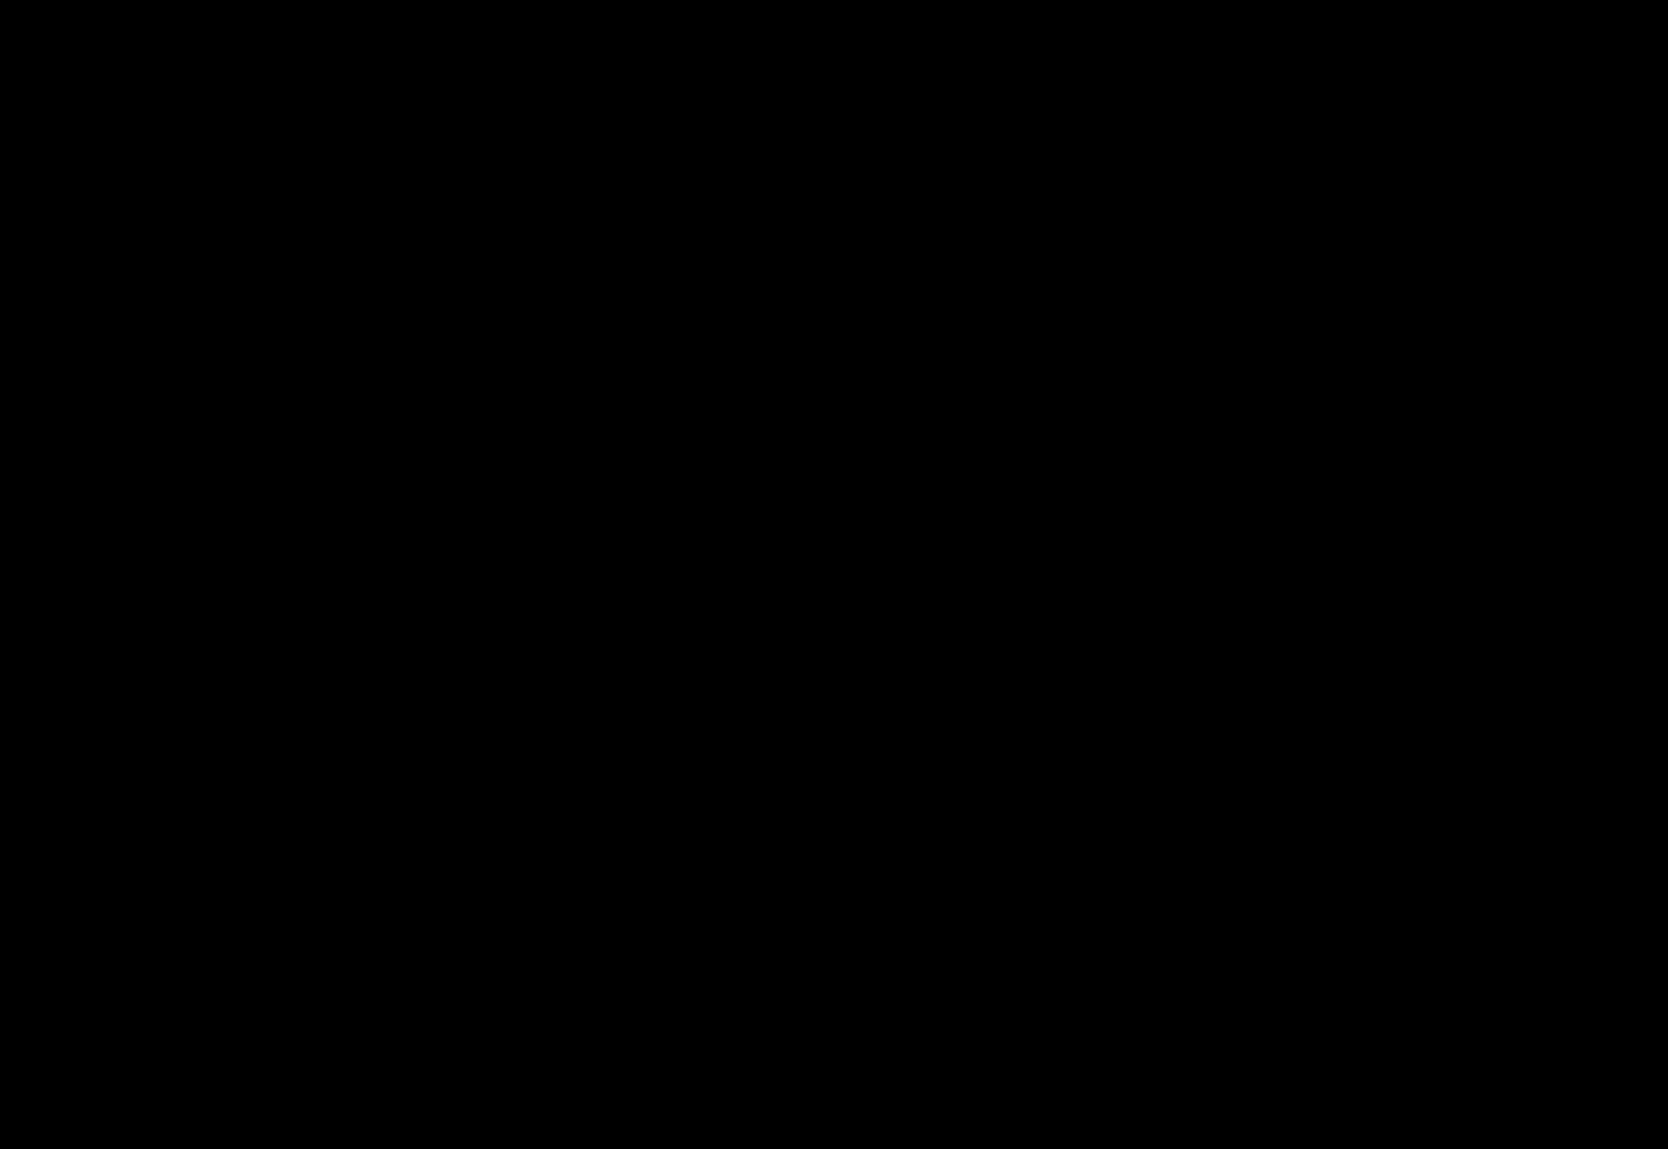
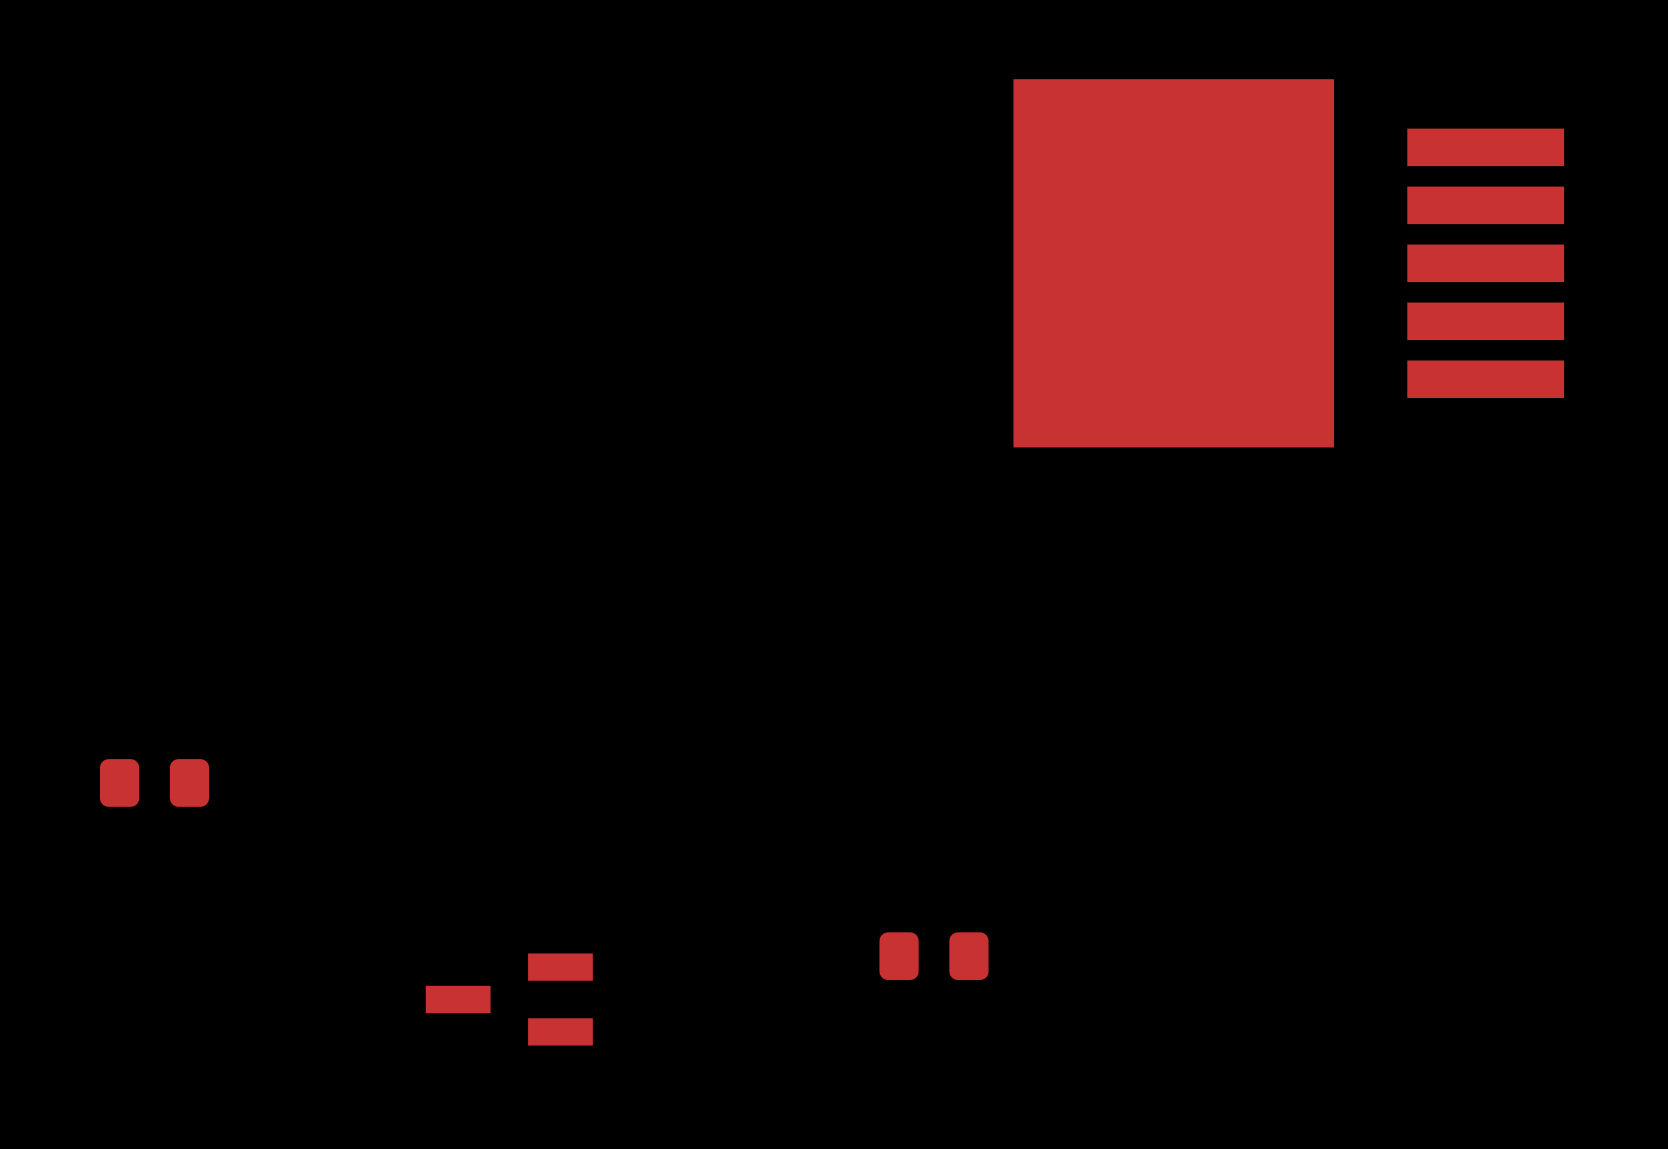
part: none -> (1288, 263)
part: none -> (154, 782)
part: none -> (934, 956)
part: none -> (509, 999)

